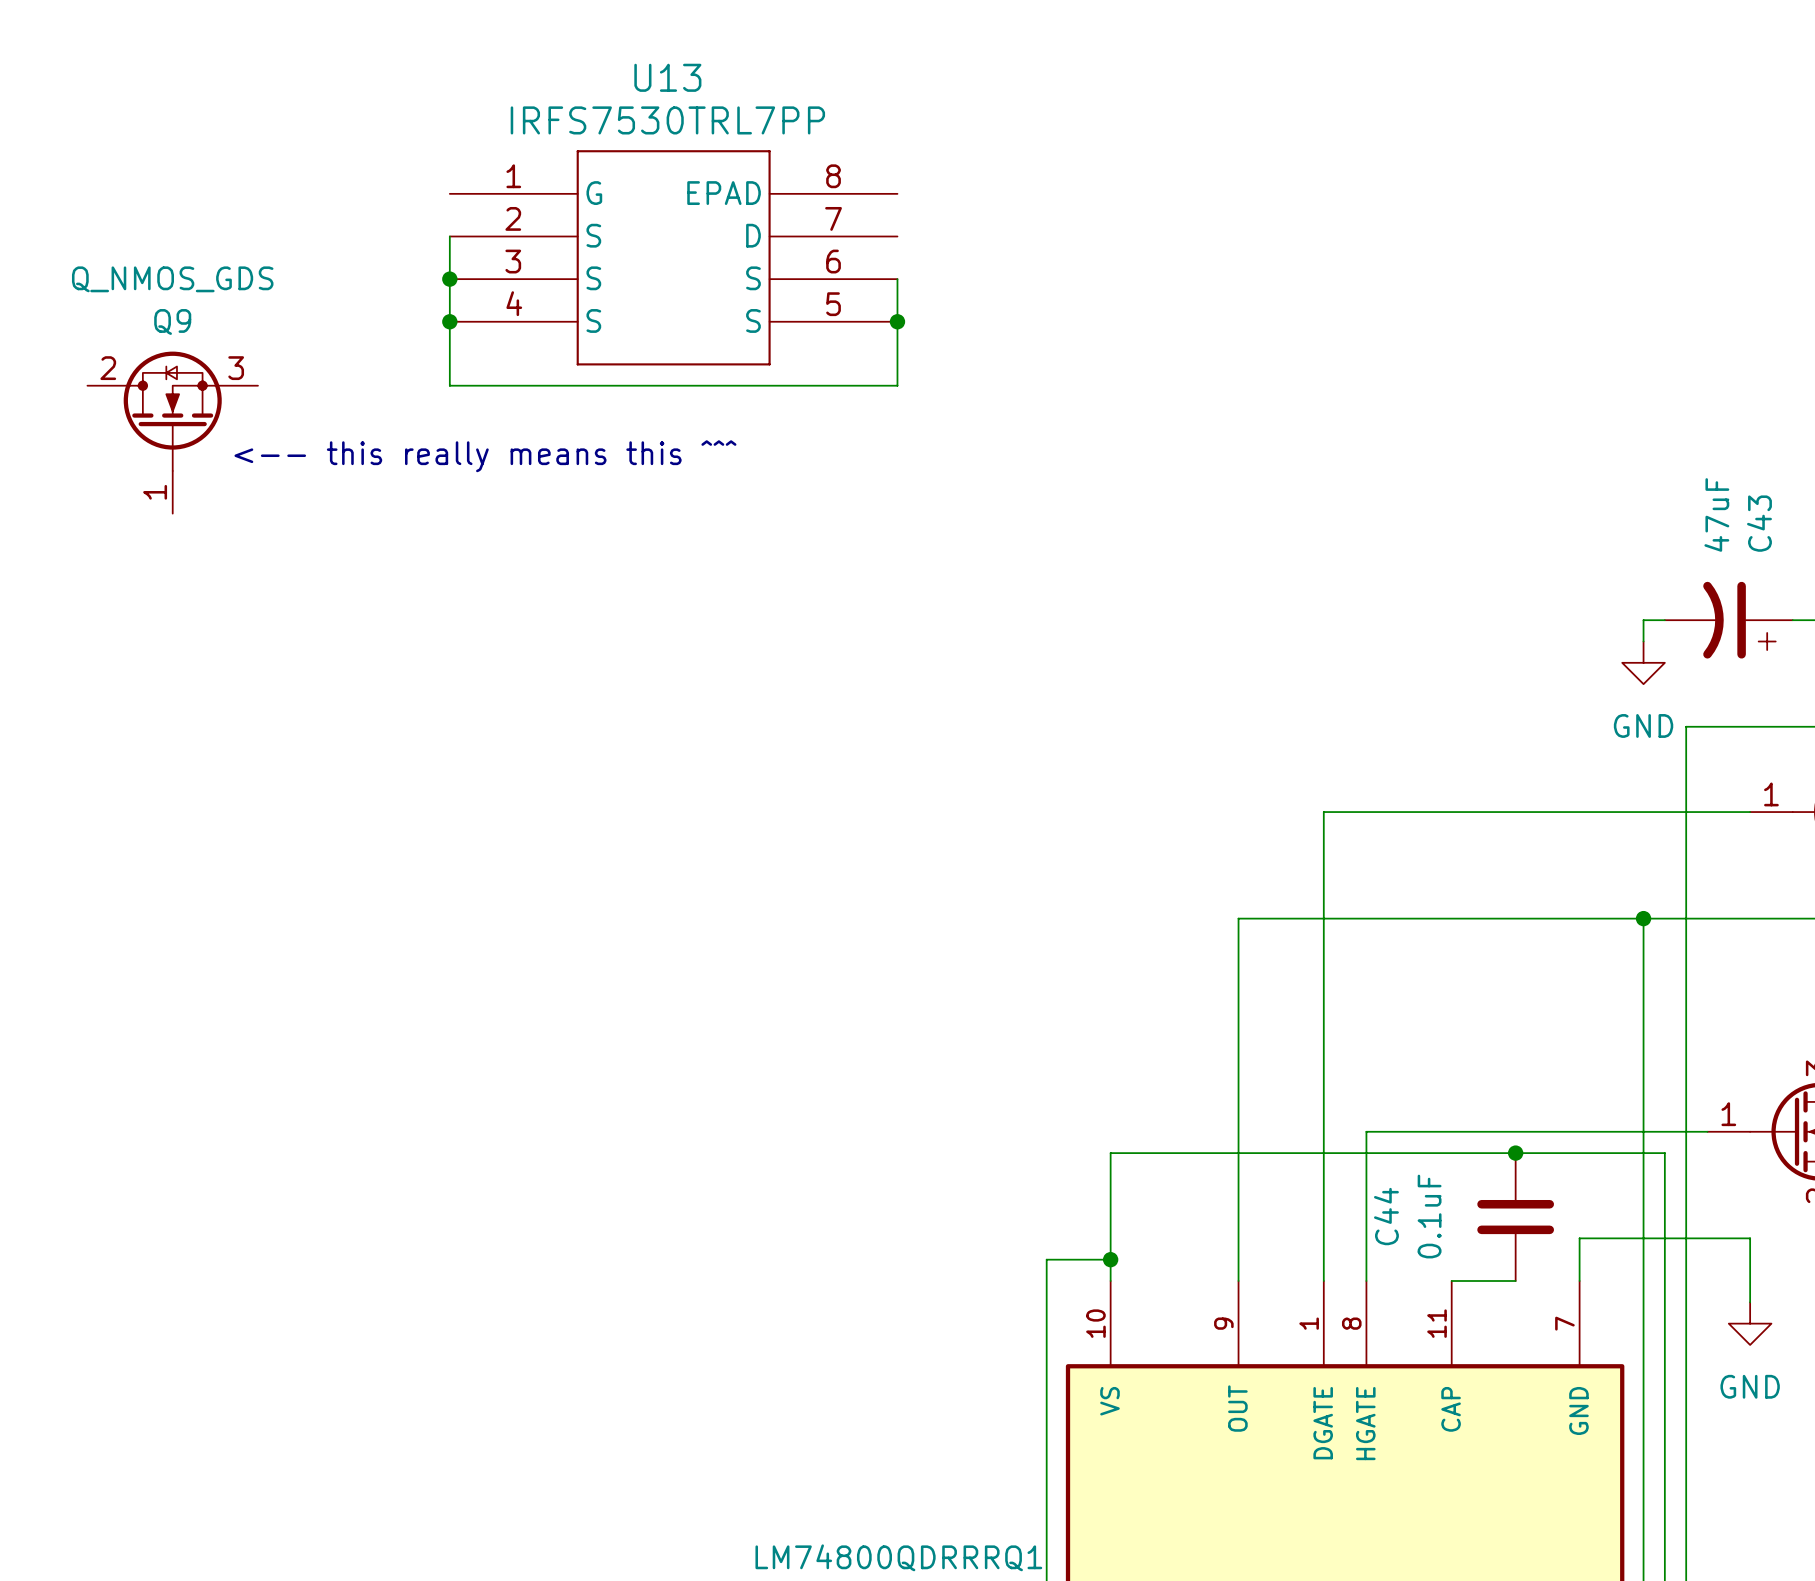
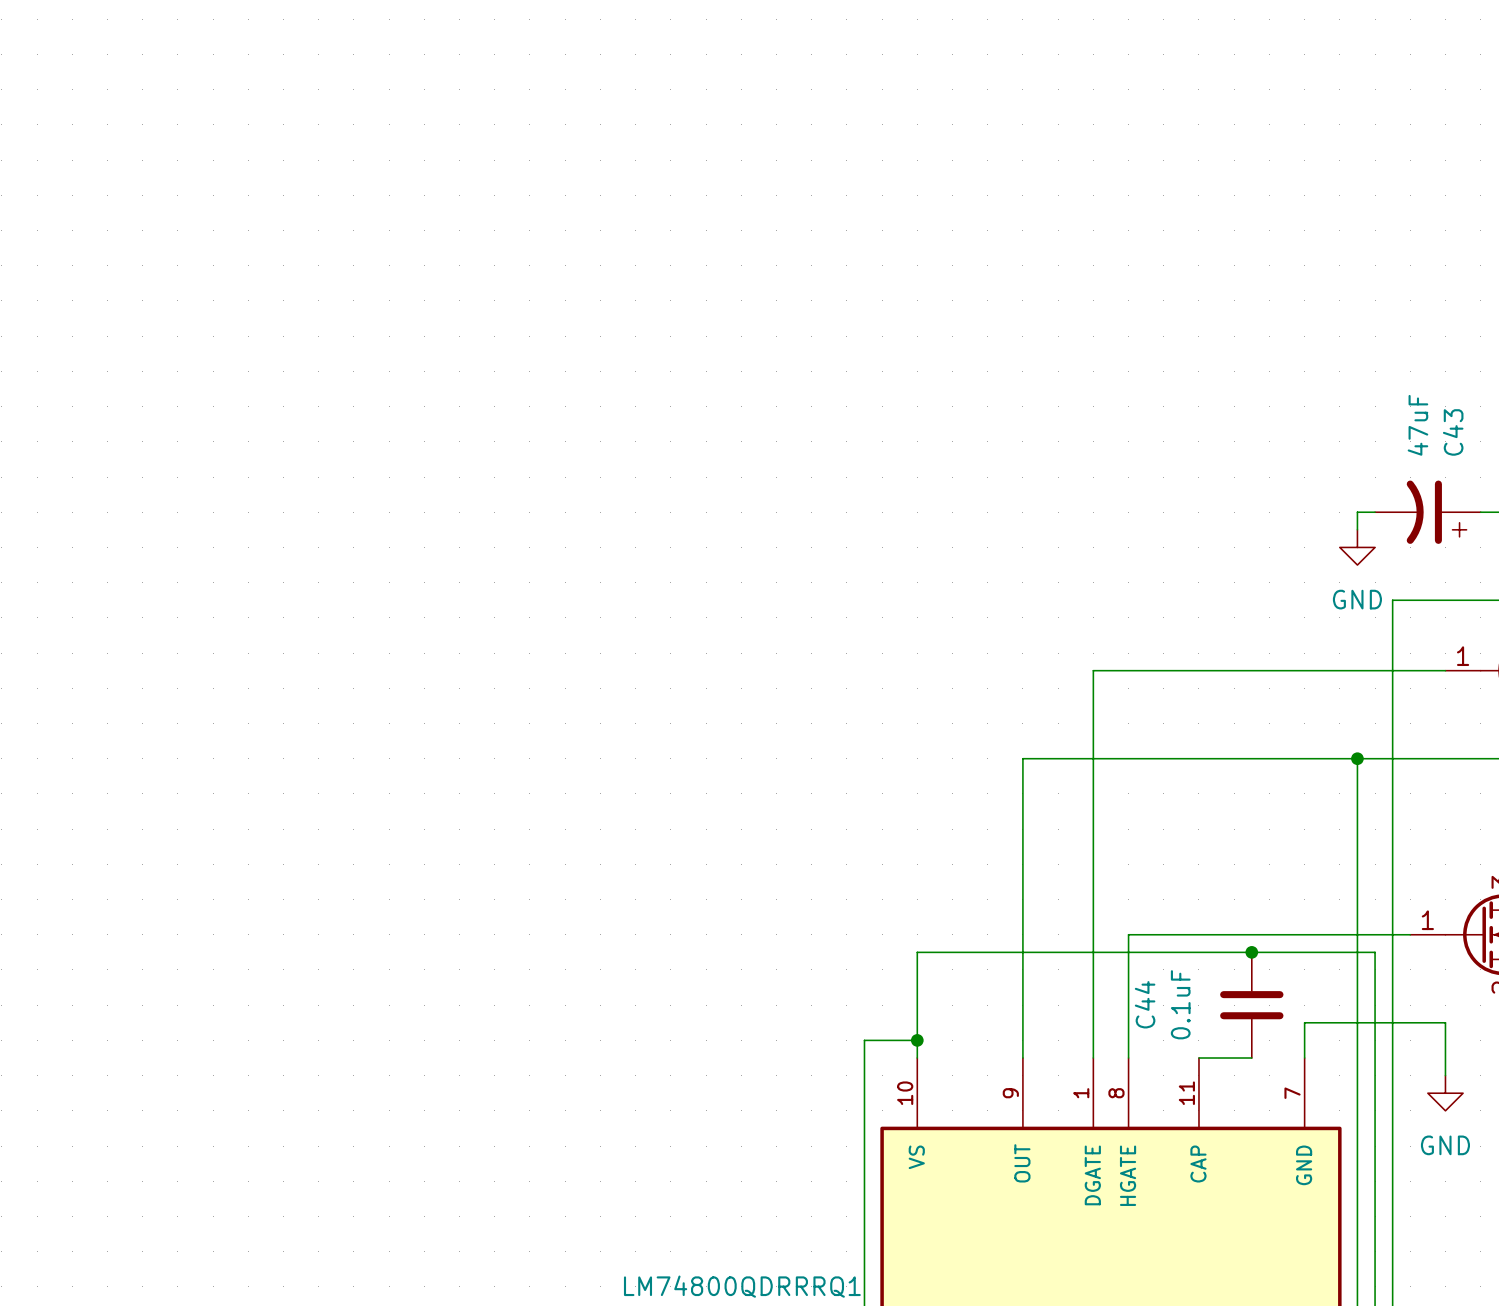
wire: (449, 236) (449, 385) (897, 385) (897, 279) -> none
U13: IRFS7530TRL7PP (673, 257) -> none
junction: (449, 279) -> none
junction: (449, 321) -> none
junction: (897, 321) -> none
Q9: Q_NMOS_GDS (172, 432) -> none
text: <-- this really means this ^^^ (485, 456) -> none

